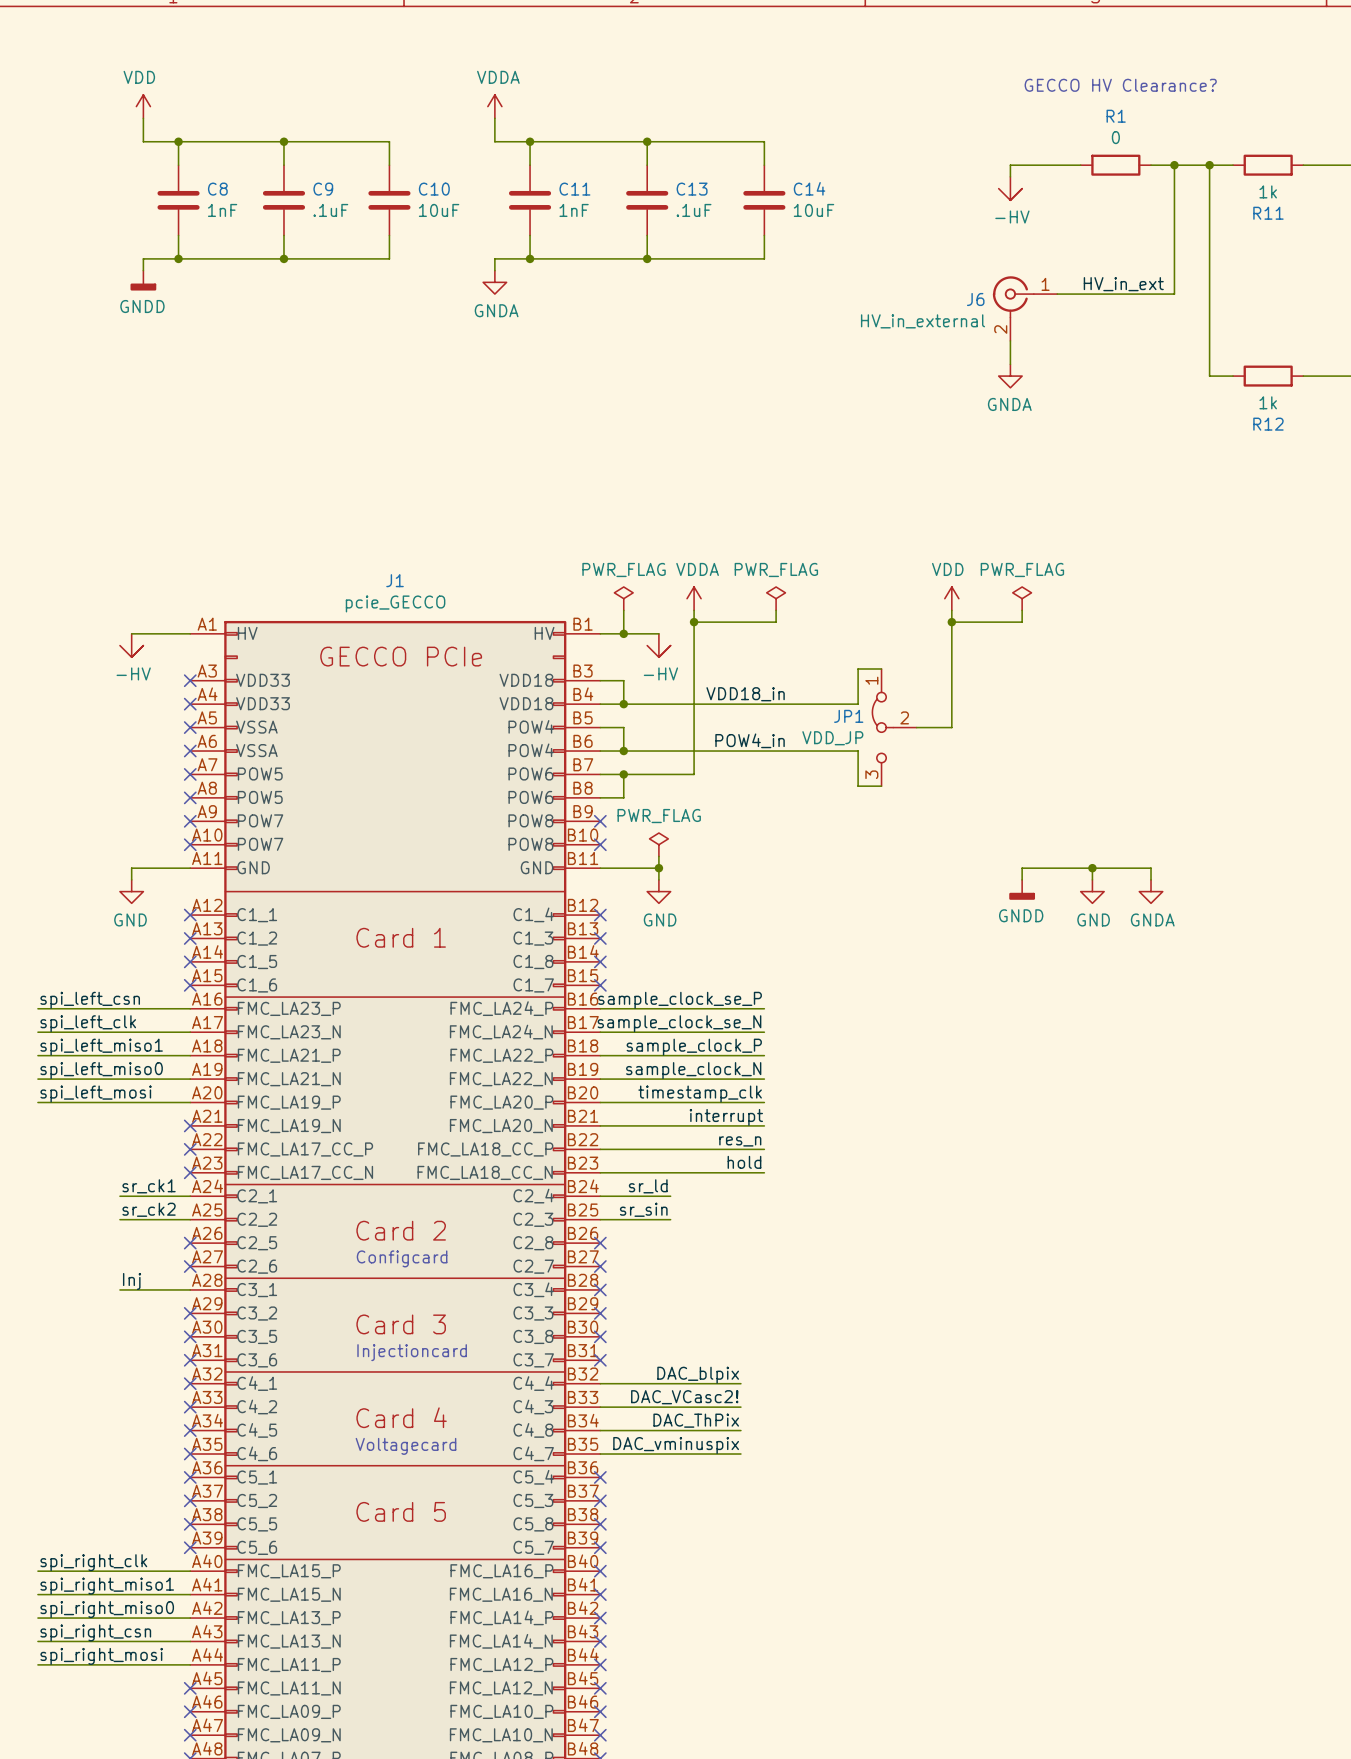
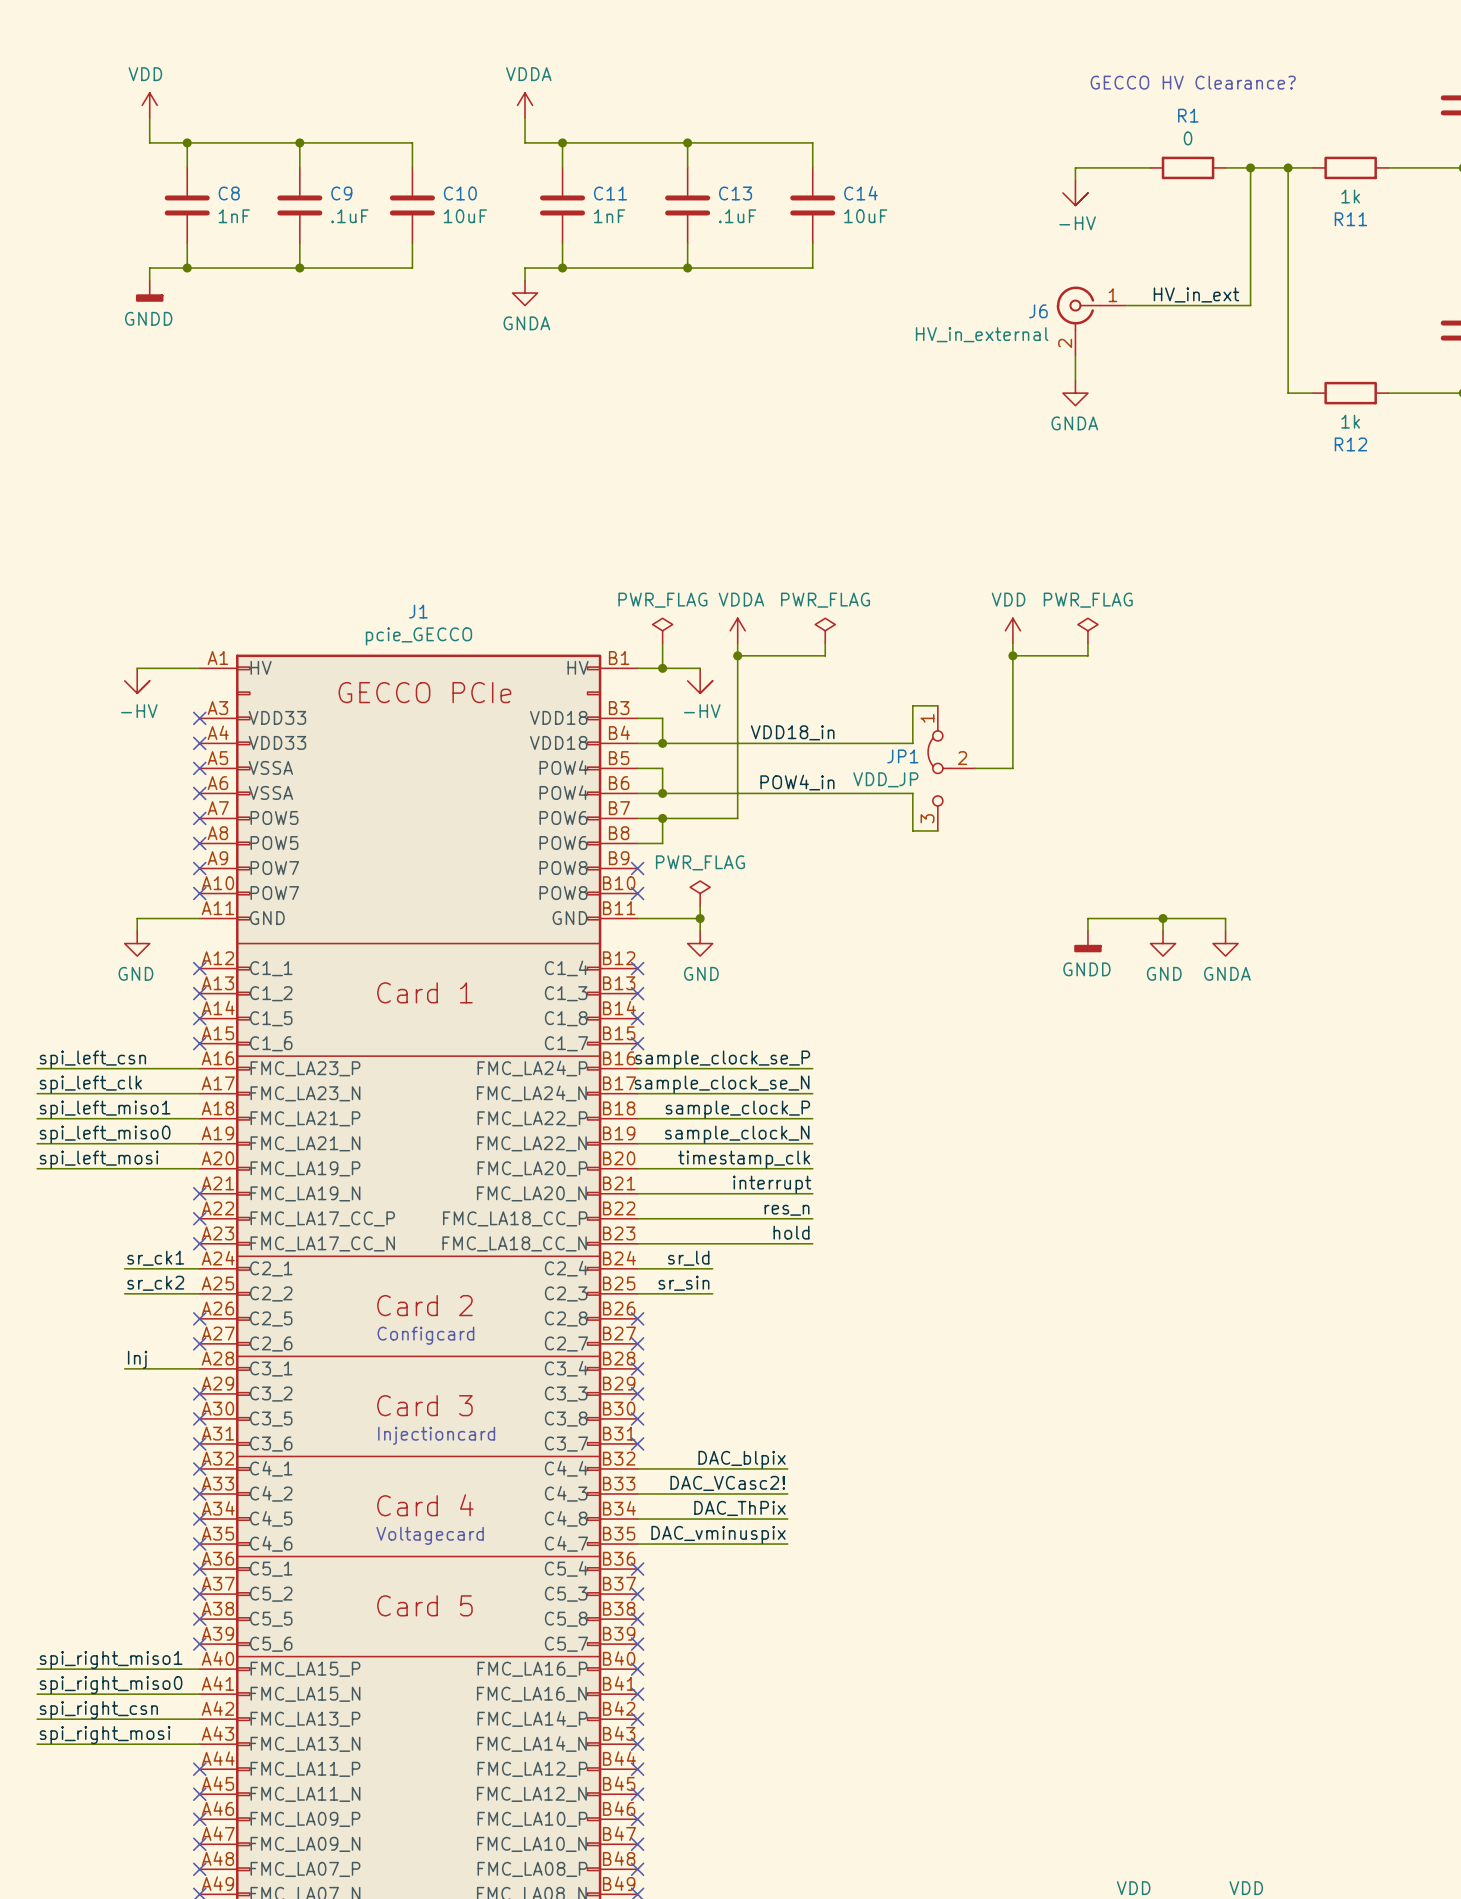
label: spi_right_clk (93, 1562) -> spi_right_miso1 (111, 1660)
label: spi_right_miso1 (107, 1586) -> spi_right_miso0 (111, 1685)
label: spi_right_miso0 (107, 1609) -> spi_right_csn (98, 1710)
label: spi_right_csn (95, 1632) -> spi_right_mosi (105, 1735)
label: spi_right_mosi (101, 1656) -> none
wire: (37, 1664) (190, 1664) -> none
no-connect mark: none -> (199, 1769)

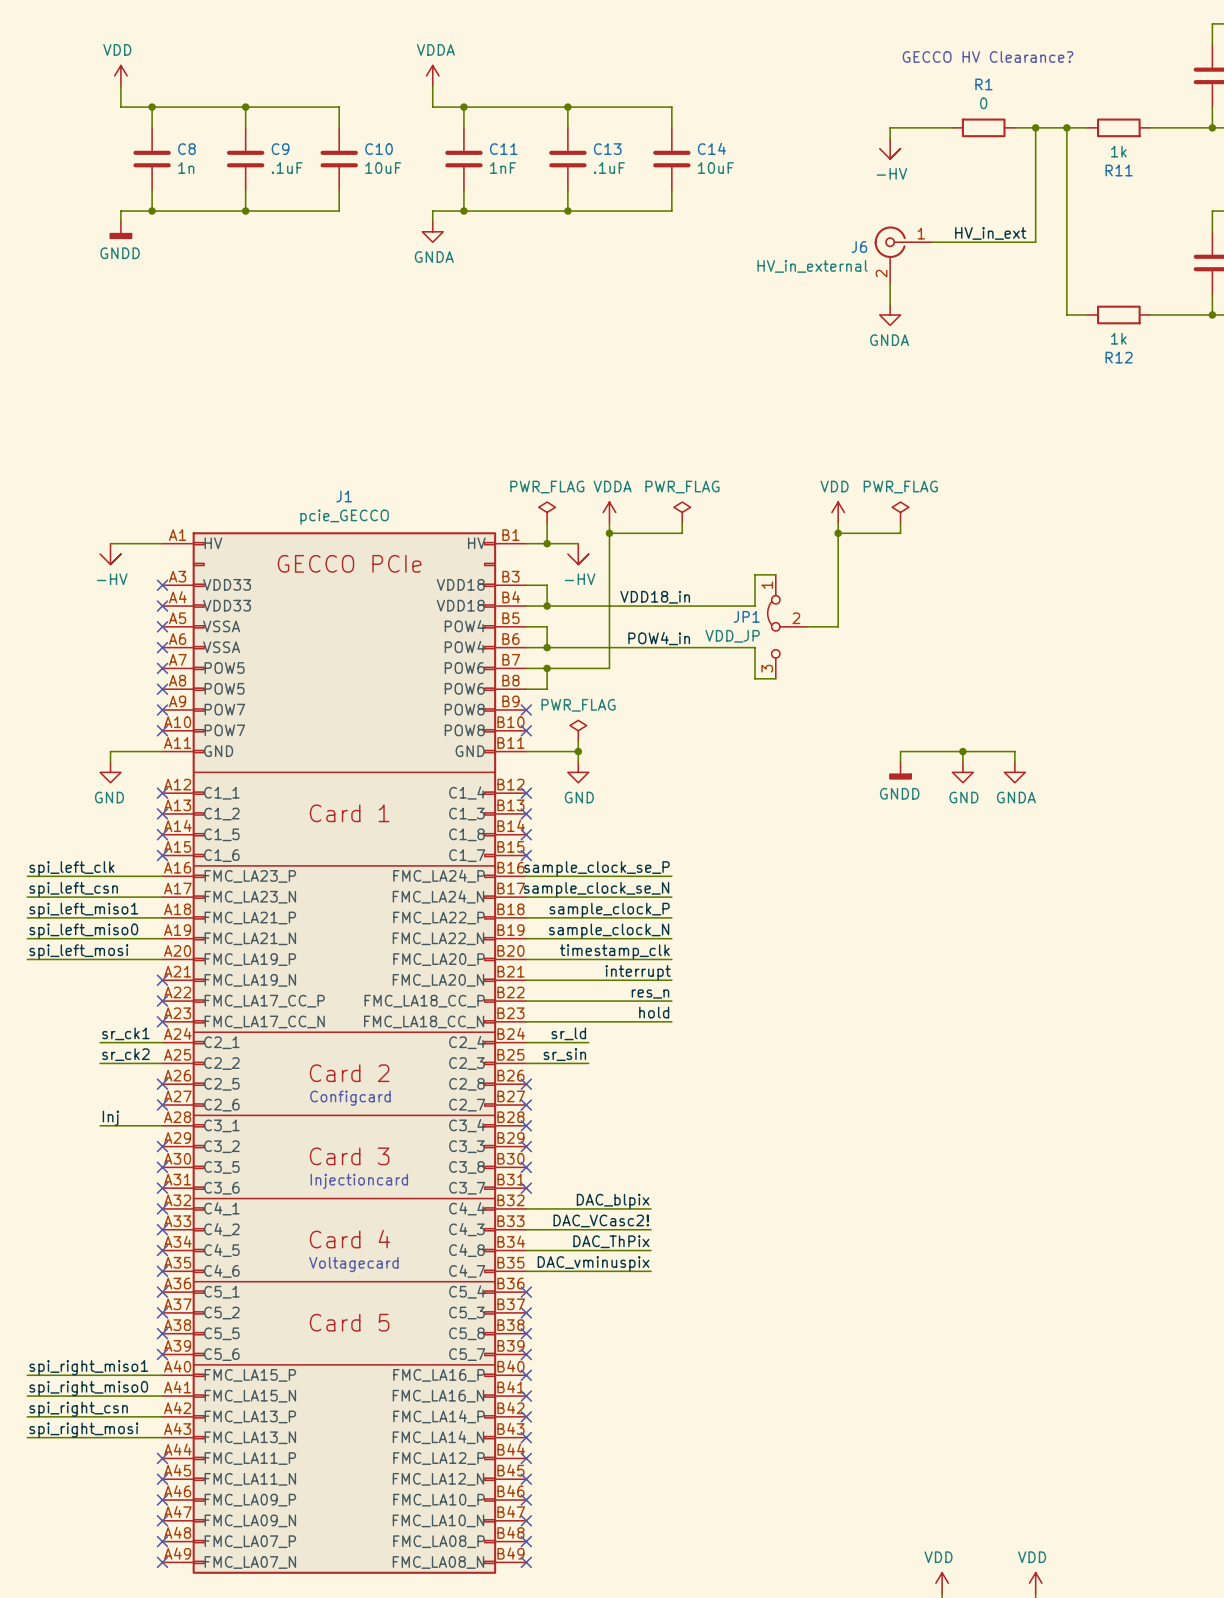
C8 value: 1nF (234, 216) -> 1n (186, 168)
label: spi_left_csn (92, 1059) -> spi_left_clk (71, 868)
label: spi_left_clk (90, 1084) -> spi_left_csn (73, 889)

